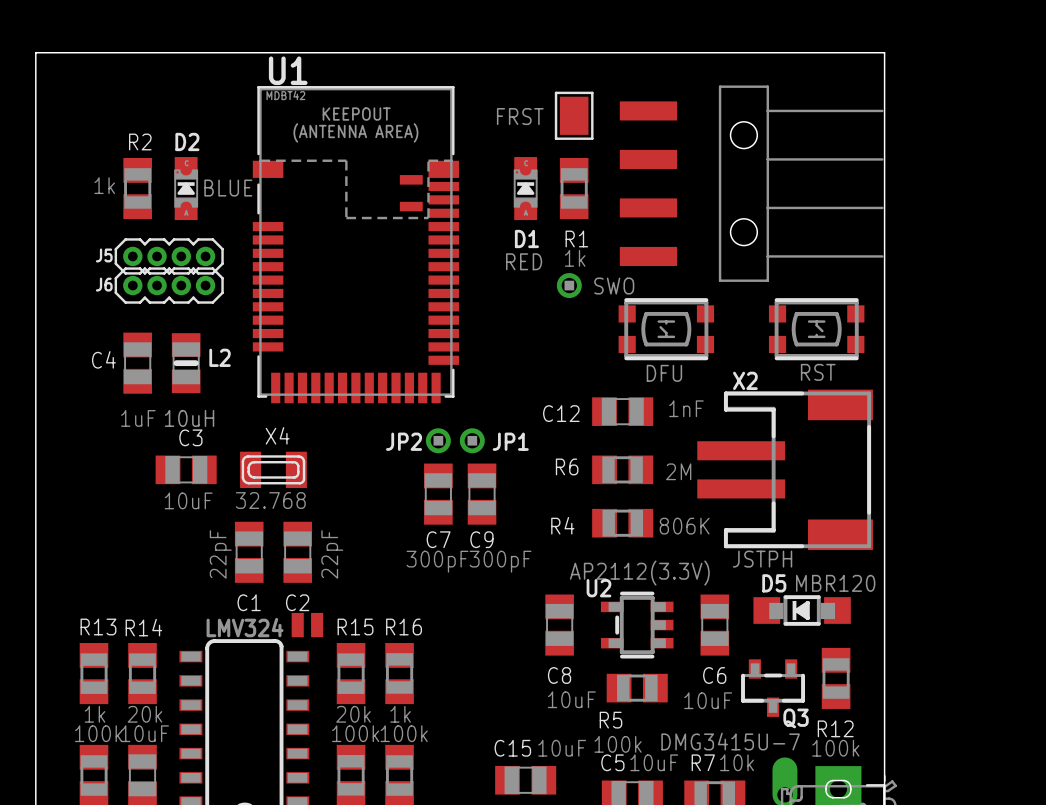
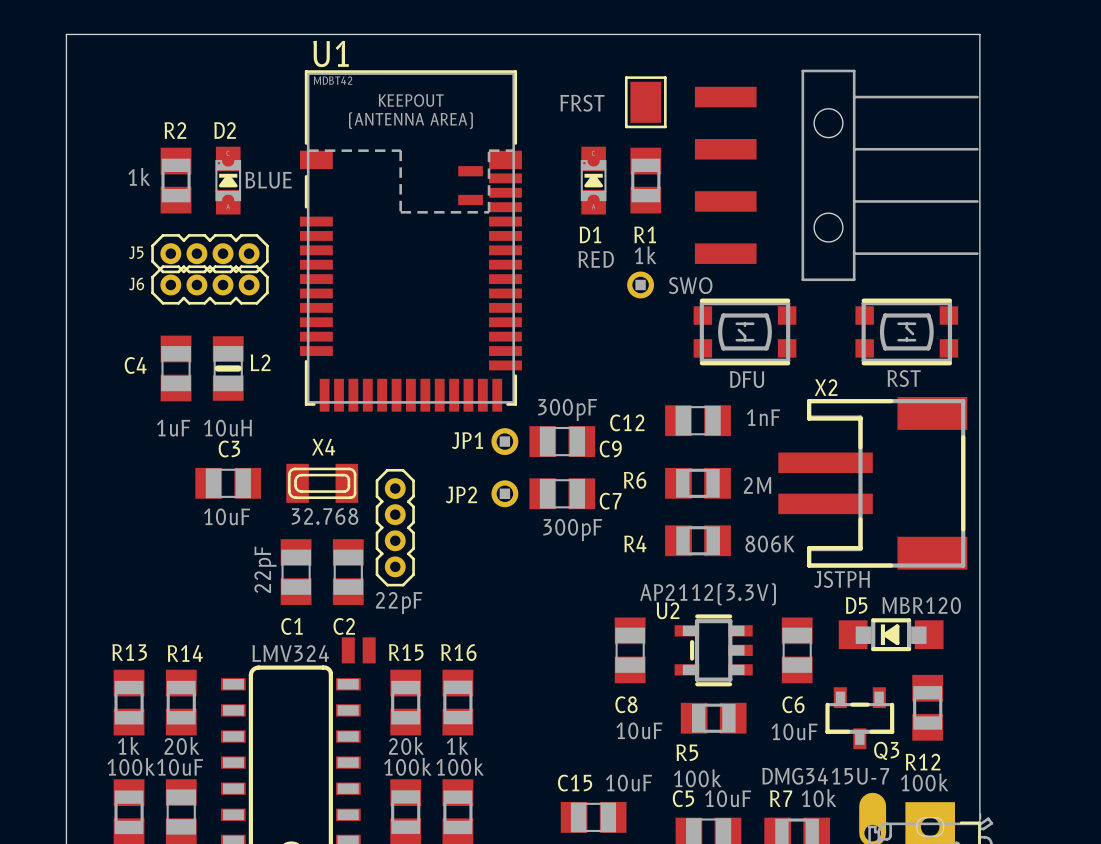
JP2 position: (438, 440) -> (504, 493)
JP1 position: (472, 440) -> (504, 441)
JP1 name position: JP1 (510, 441) -> JP1 (467, 440)
C7 rotation: 0° (438, 494) -> 90° clockwise (562, 493)
C7 position: (438, 494) -> (562, 493)
C9 rotation: 0° (482, 494) -> 90° clockwise (562, 441)
C9 position: (482, 494) -> (562, 441)
part: none -> (395, 527)
C7 name position: C7 (438, 539) -> C7 (610, 501)
C9 name position: C9 (481, 539) -> C9 (610, 448)
C2 value rotation: 0° (332, 554) -> 90° clockwise (399, 603)
C9 value position: 300pF (500, 561) -> 300pF (567, 409)

